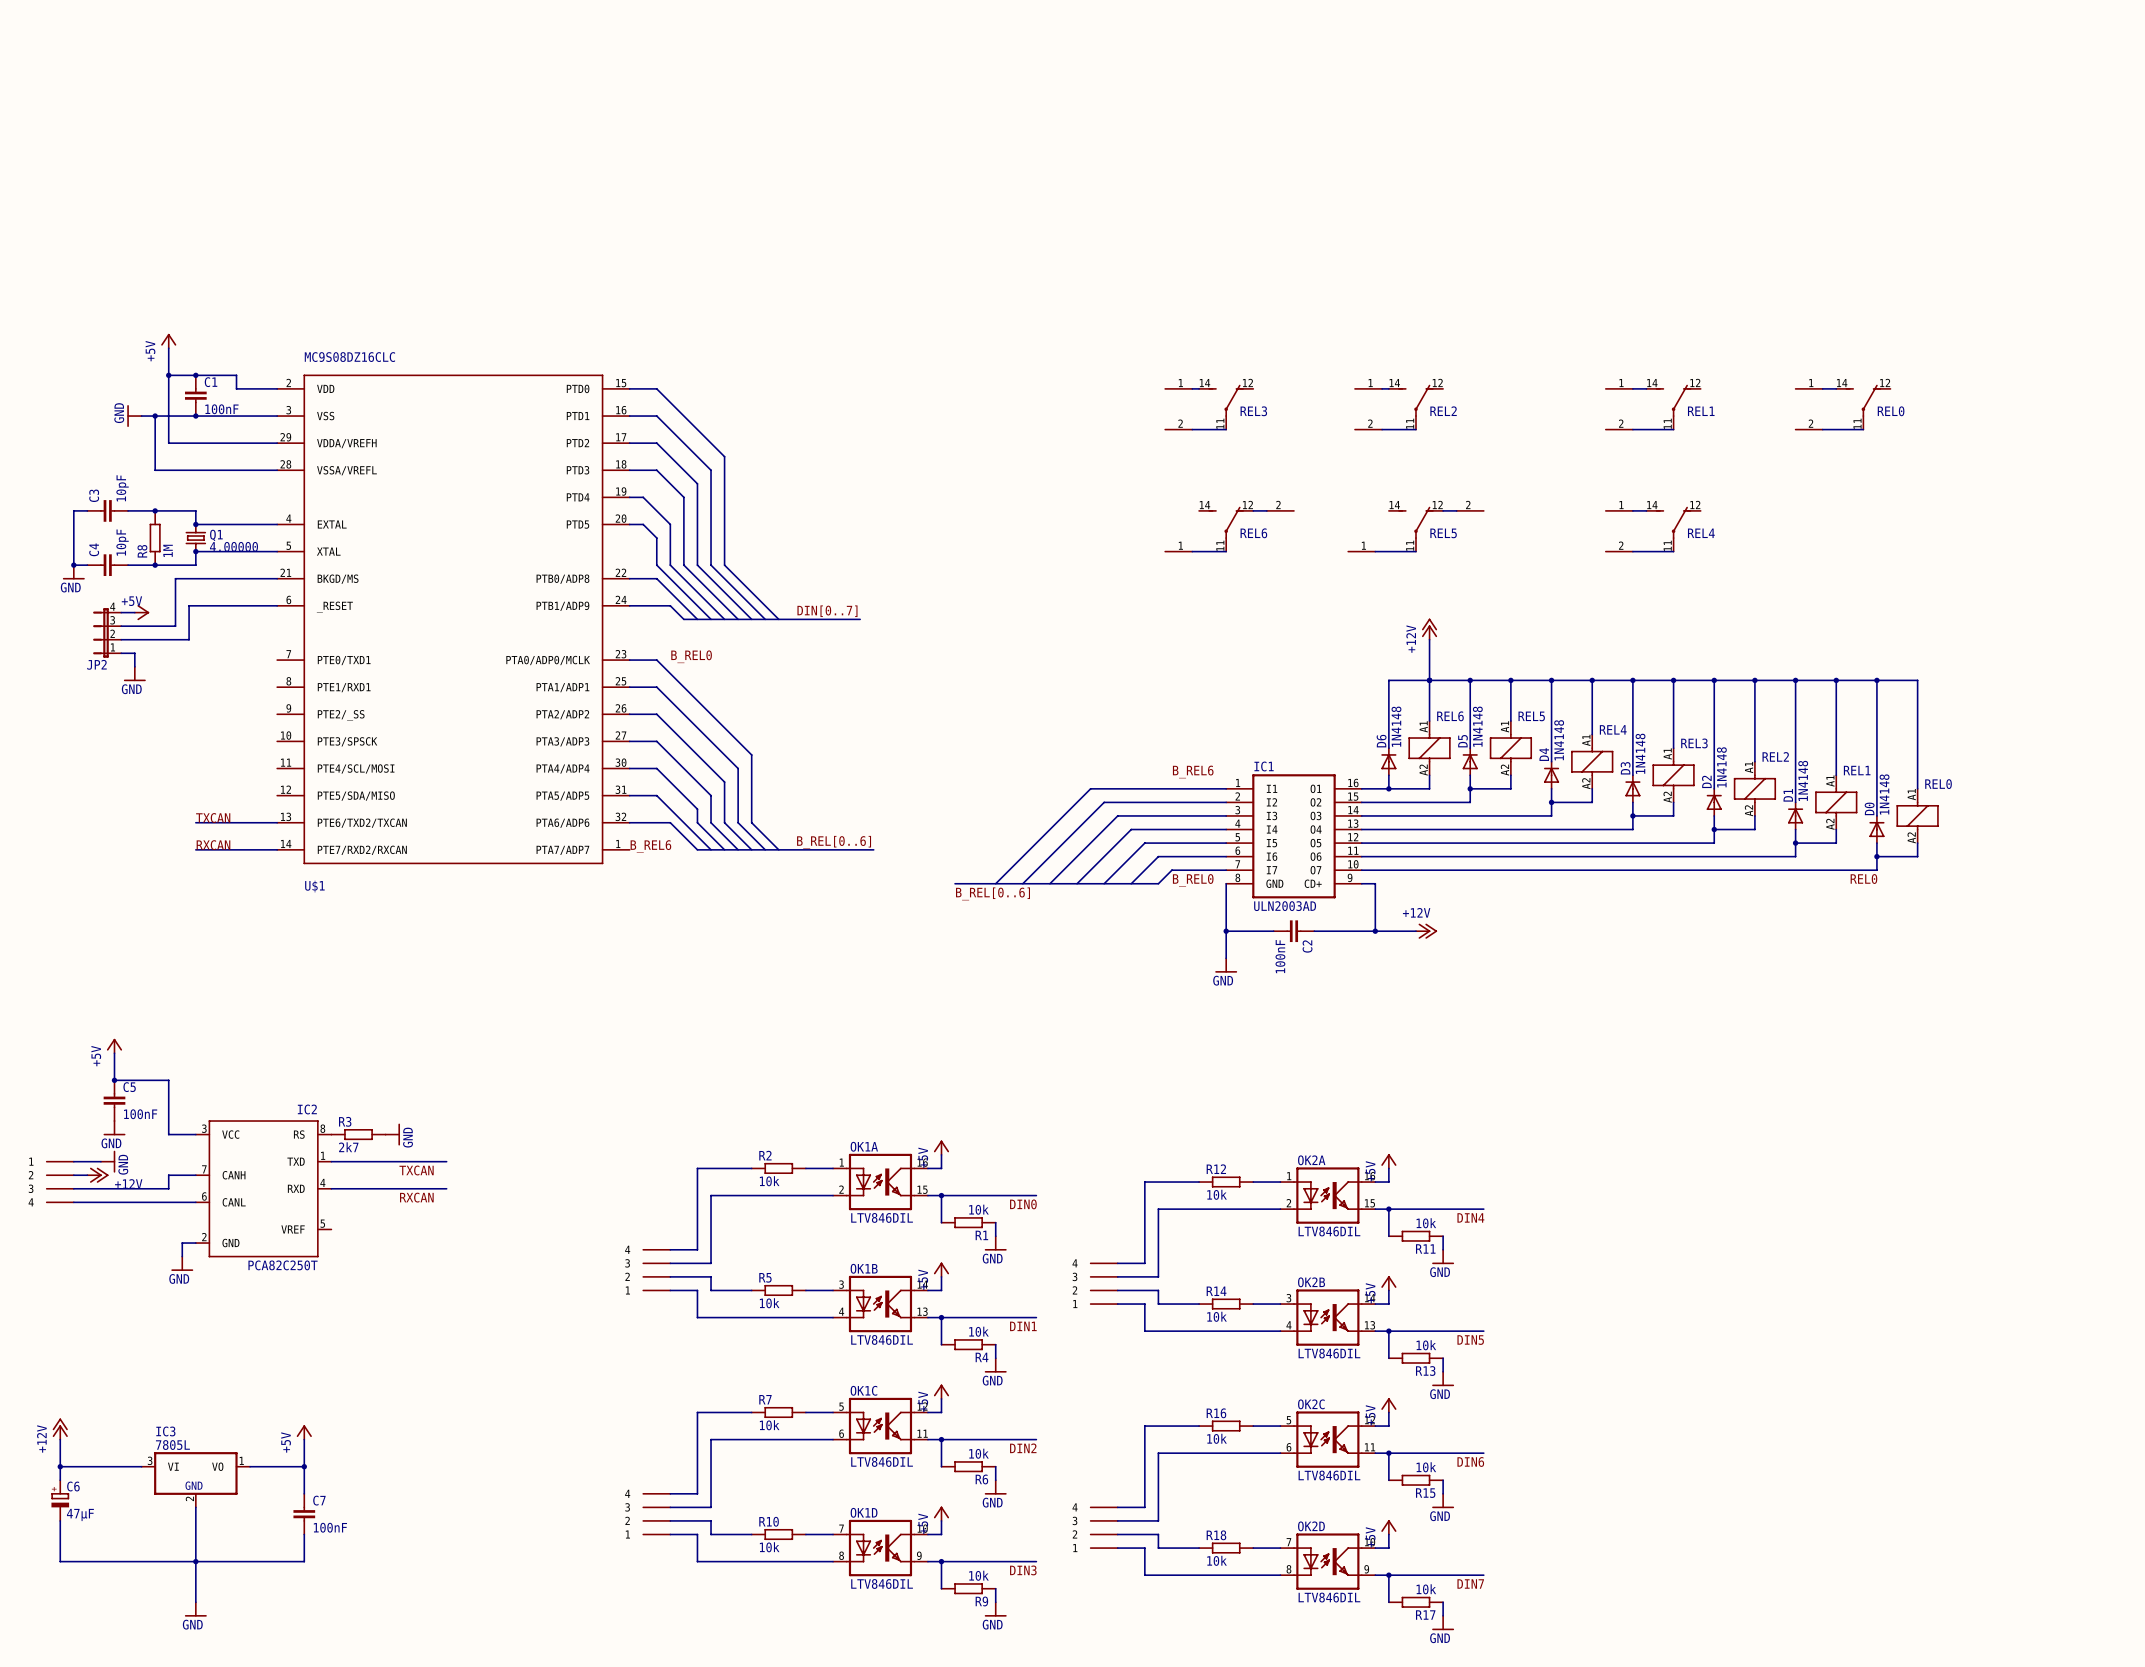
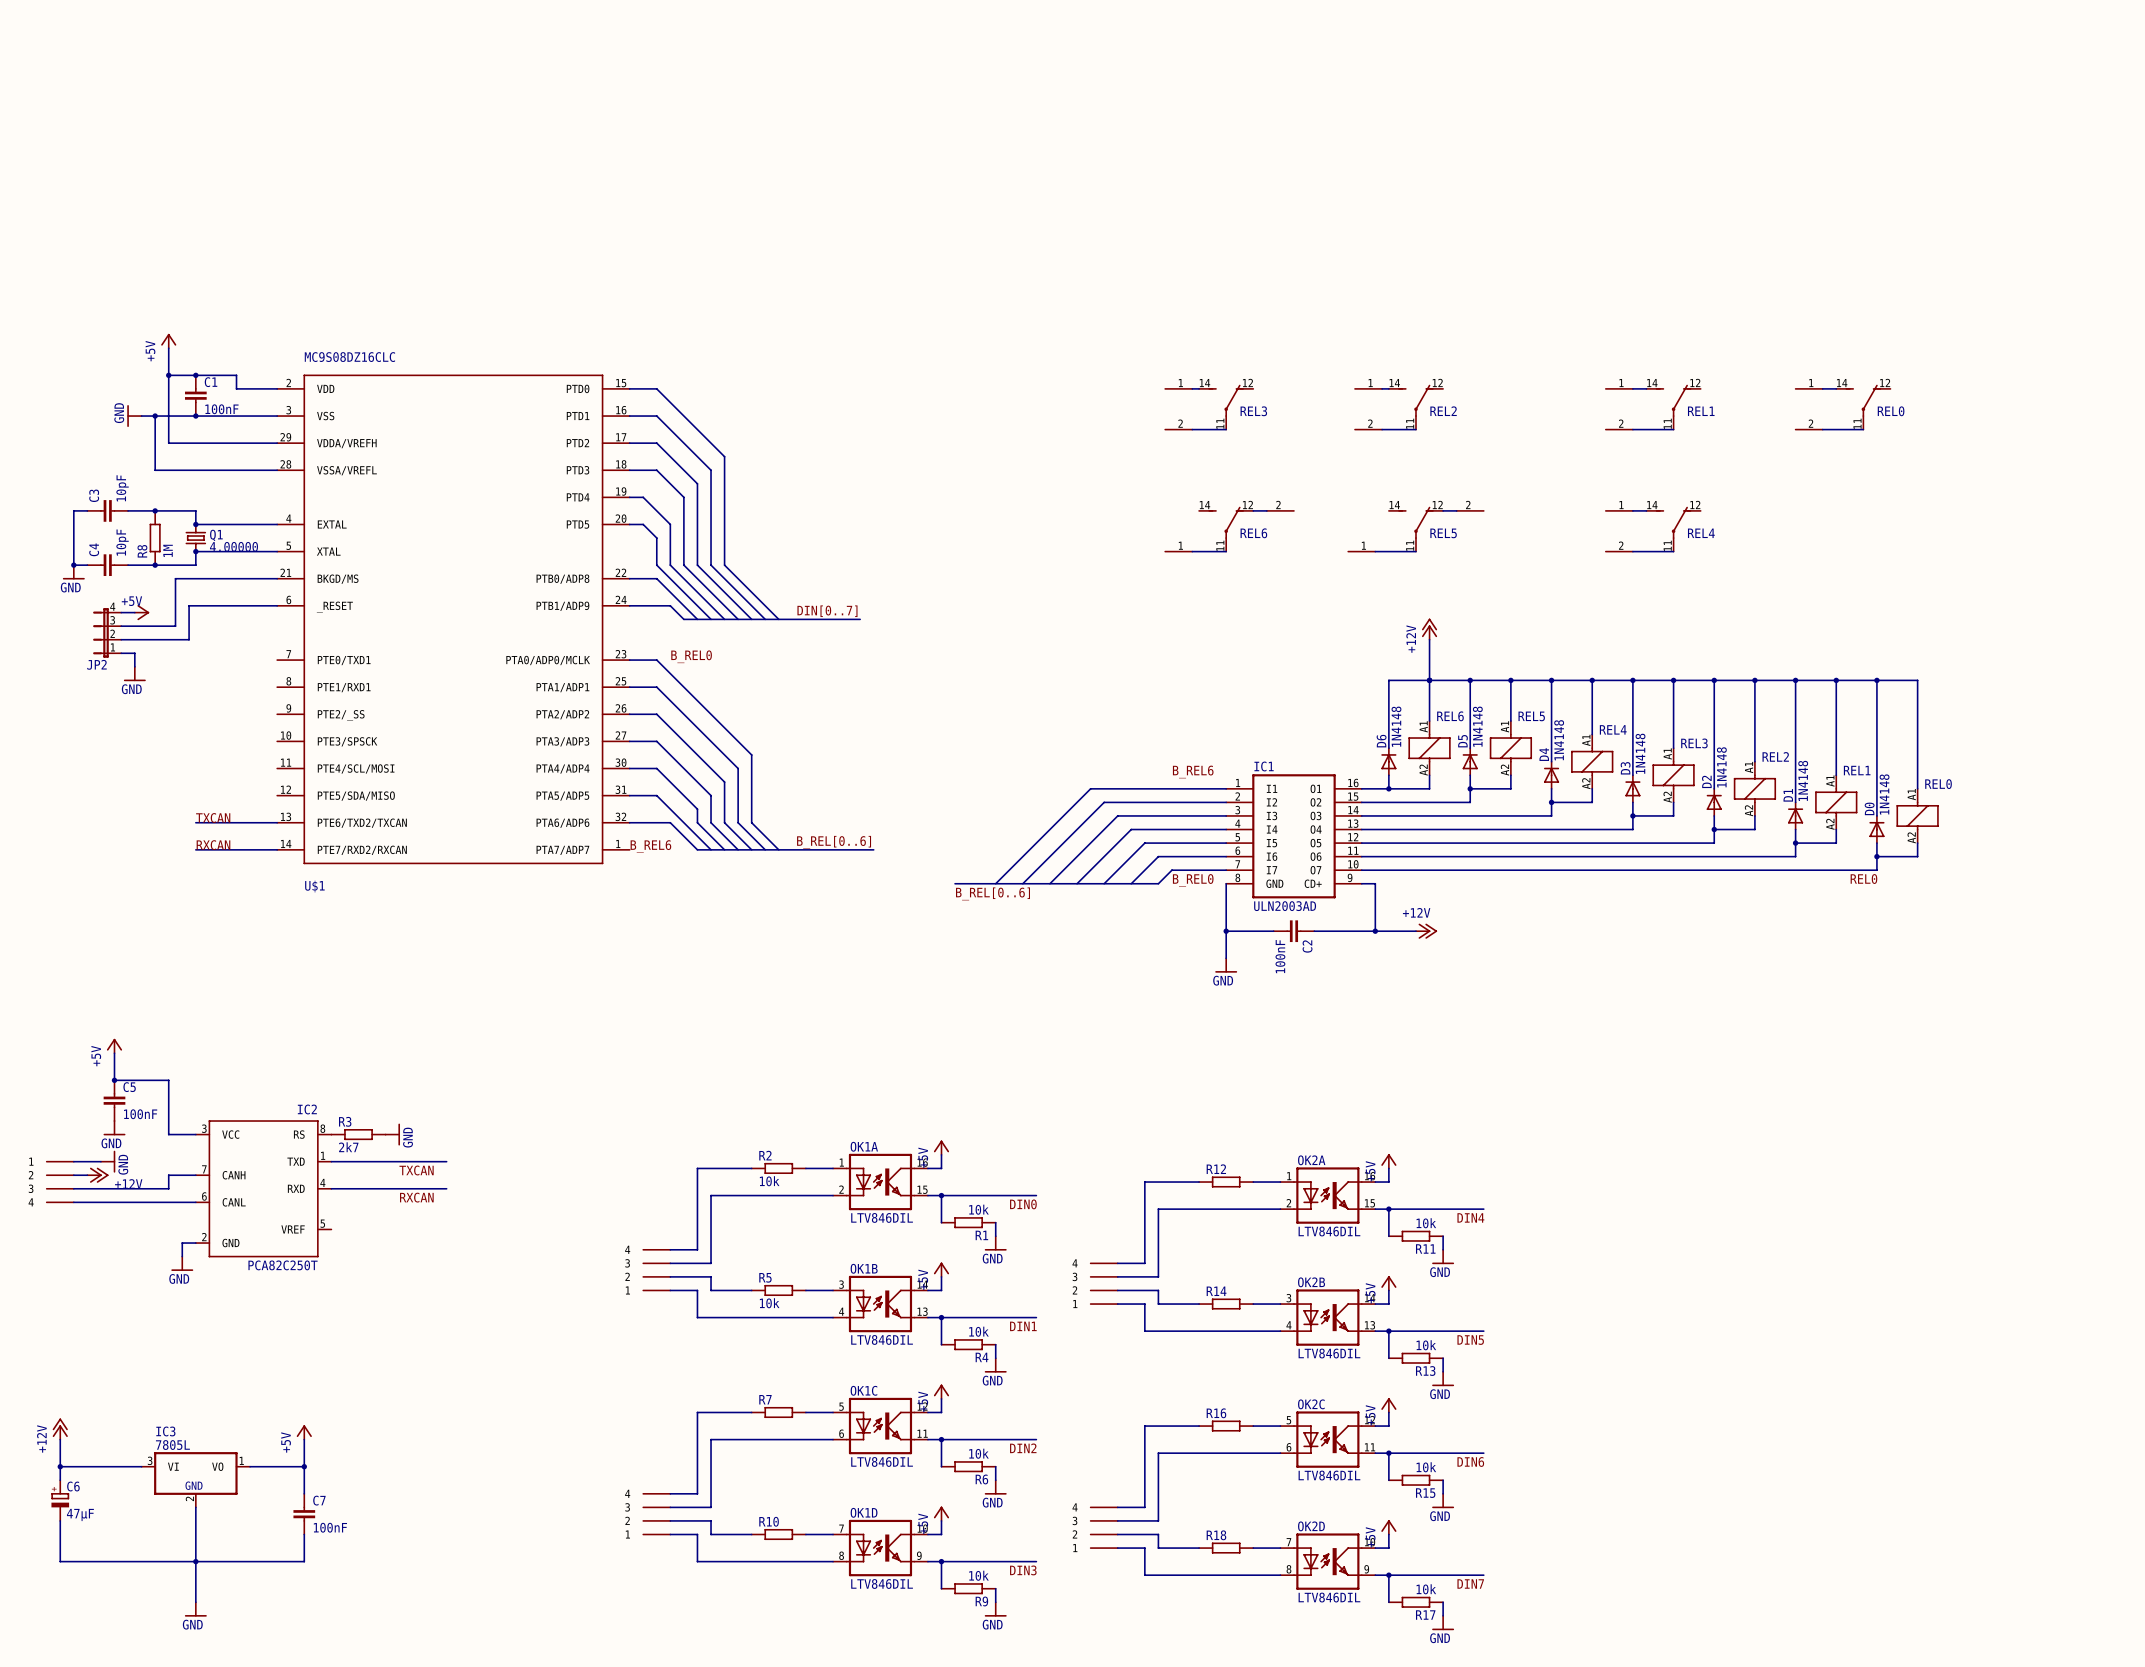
R12 value: 10k (1217, 1194) -> none
R14 value: 10k (1217, 1316) -> none
R7 value: 10k (769, 1425) -> none
R16 value: 10k (1217, 1438) -> none
R10 value: 10k (769, 1547) -> none
R18 value: 10k (1217, 1560) -> none

